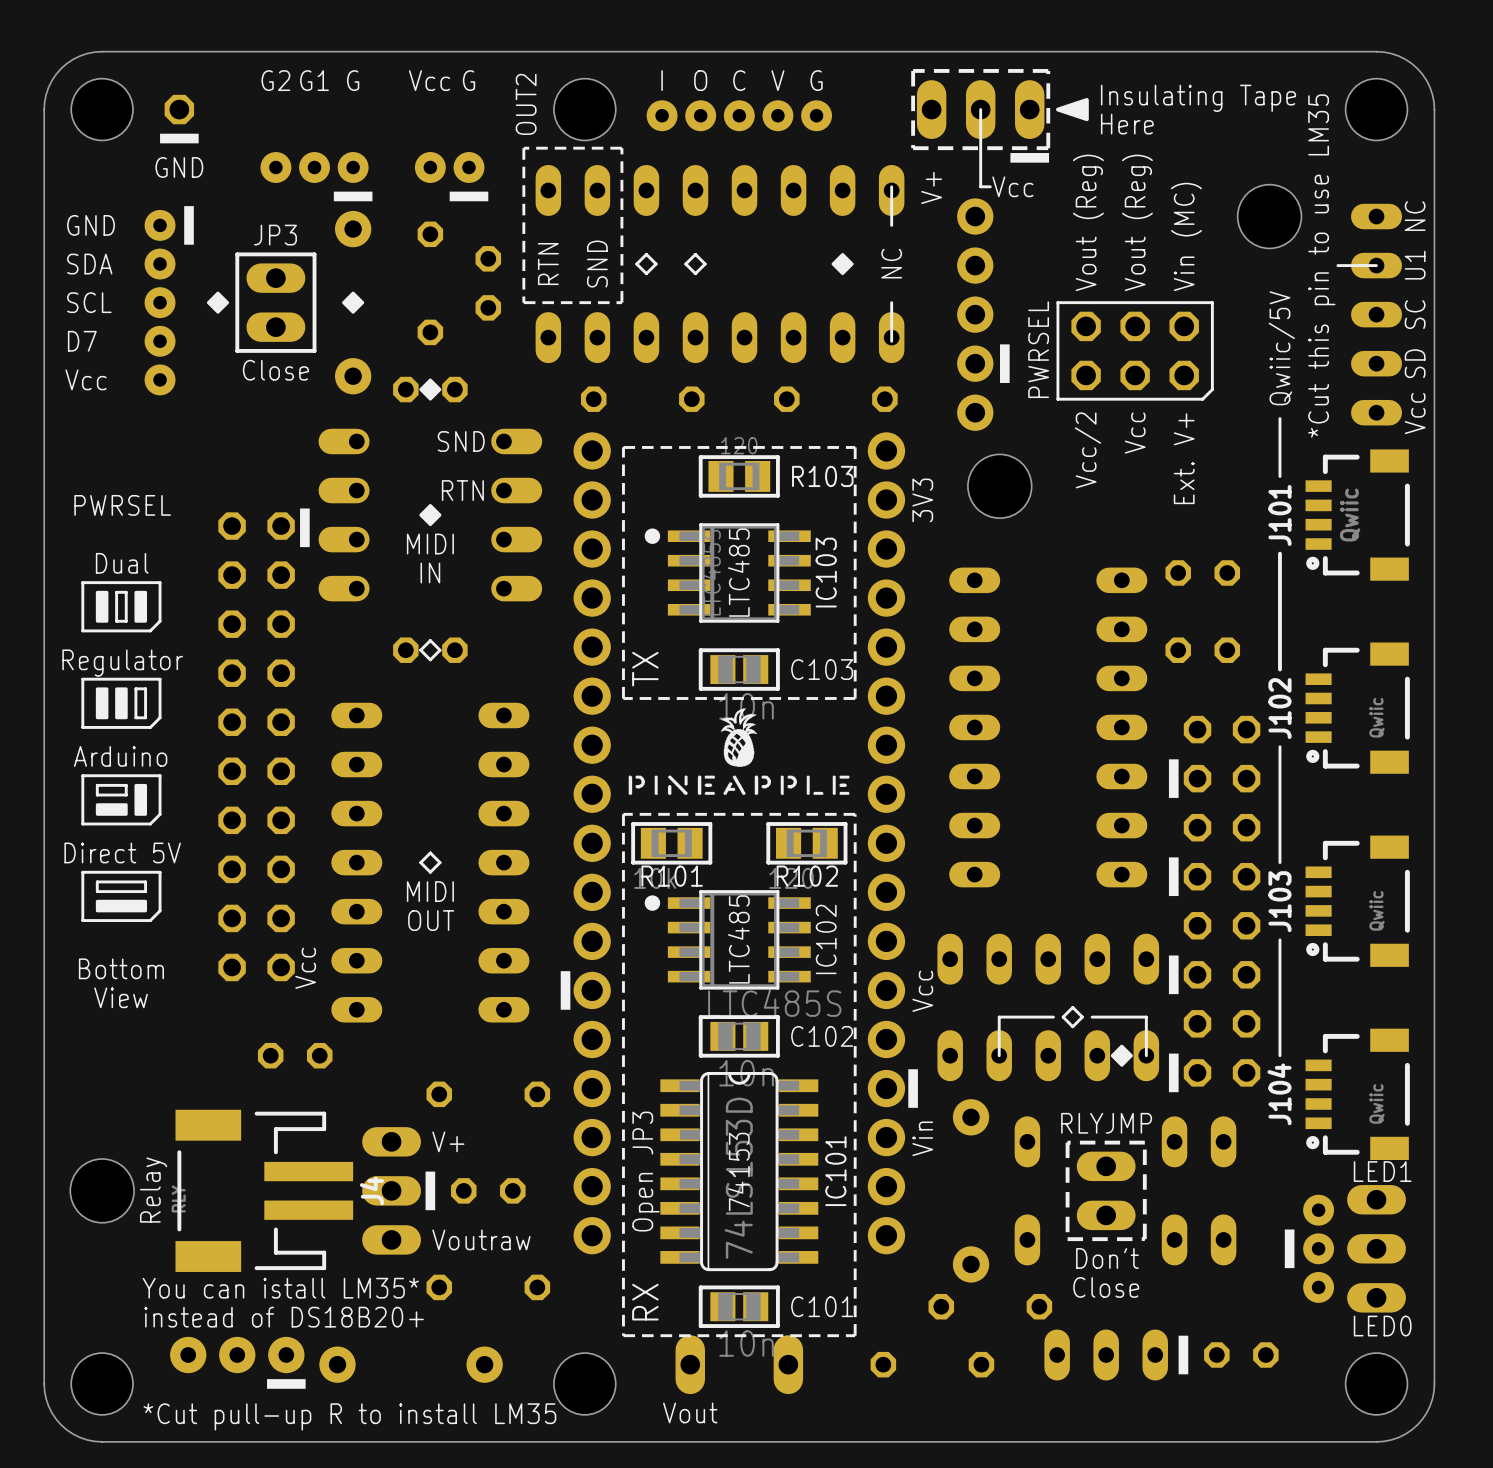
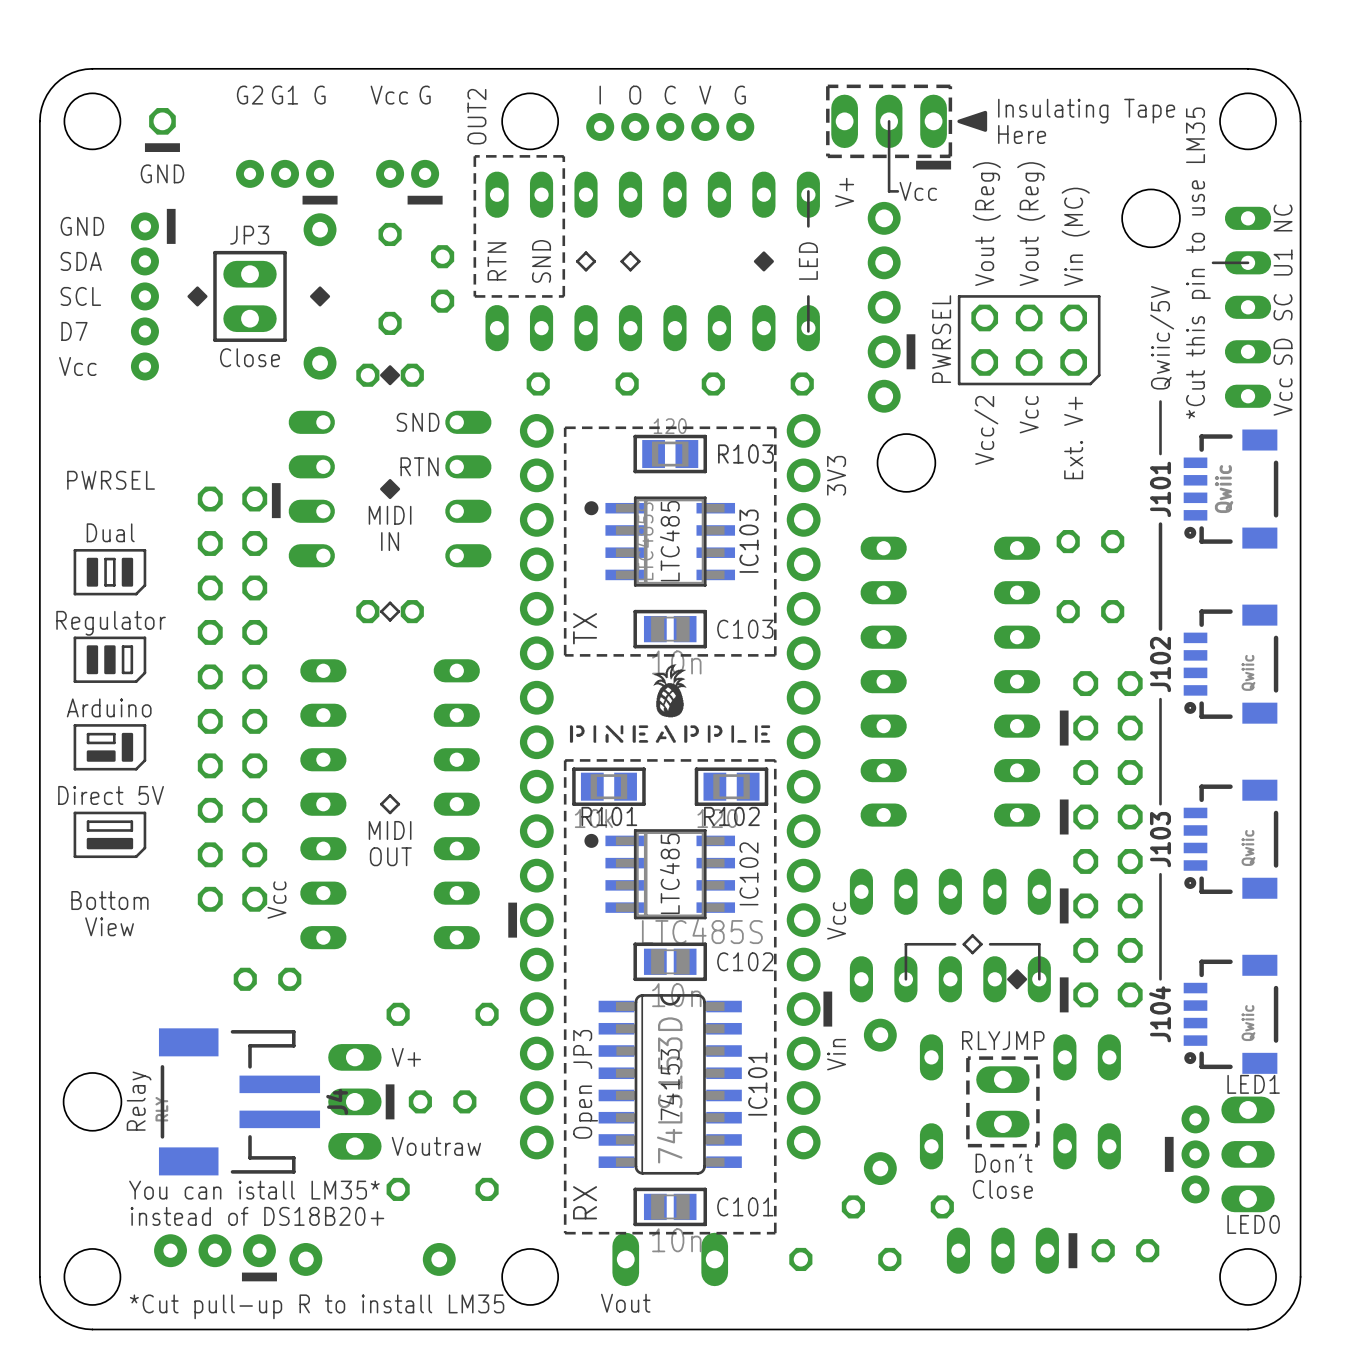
text: NC (891, 263) -> LED (808, 261)

